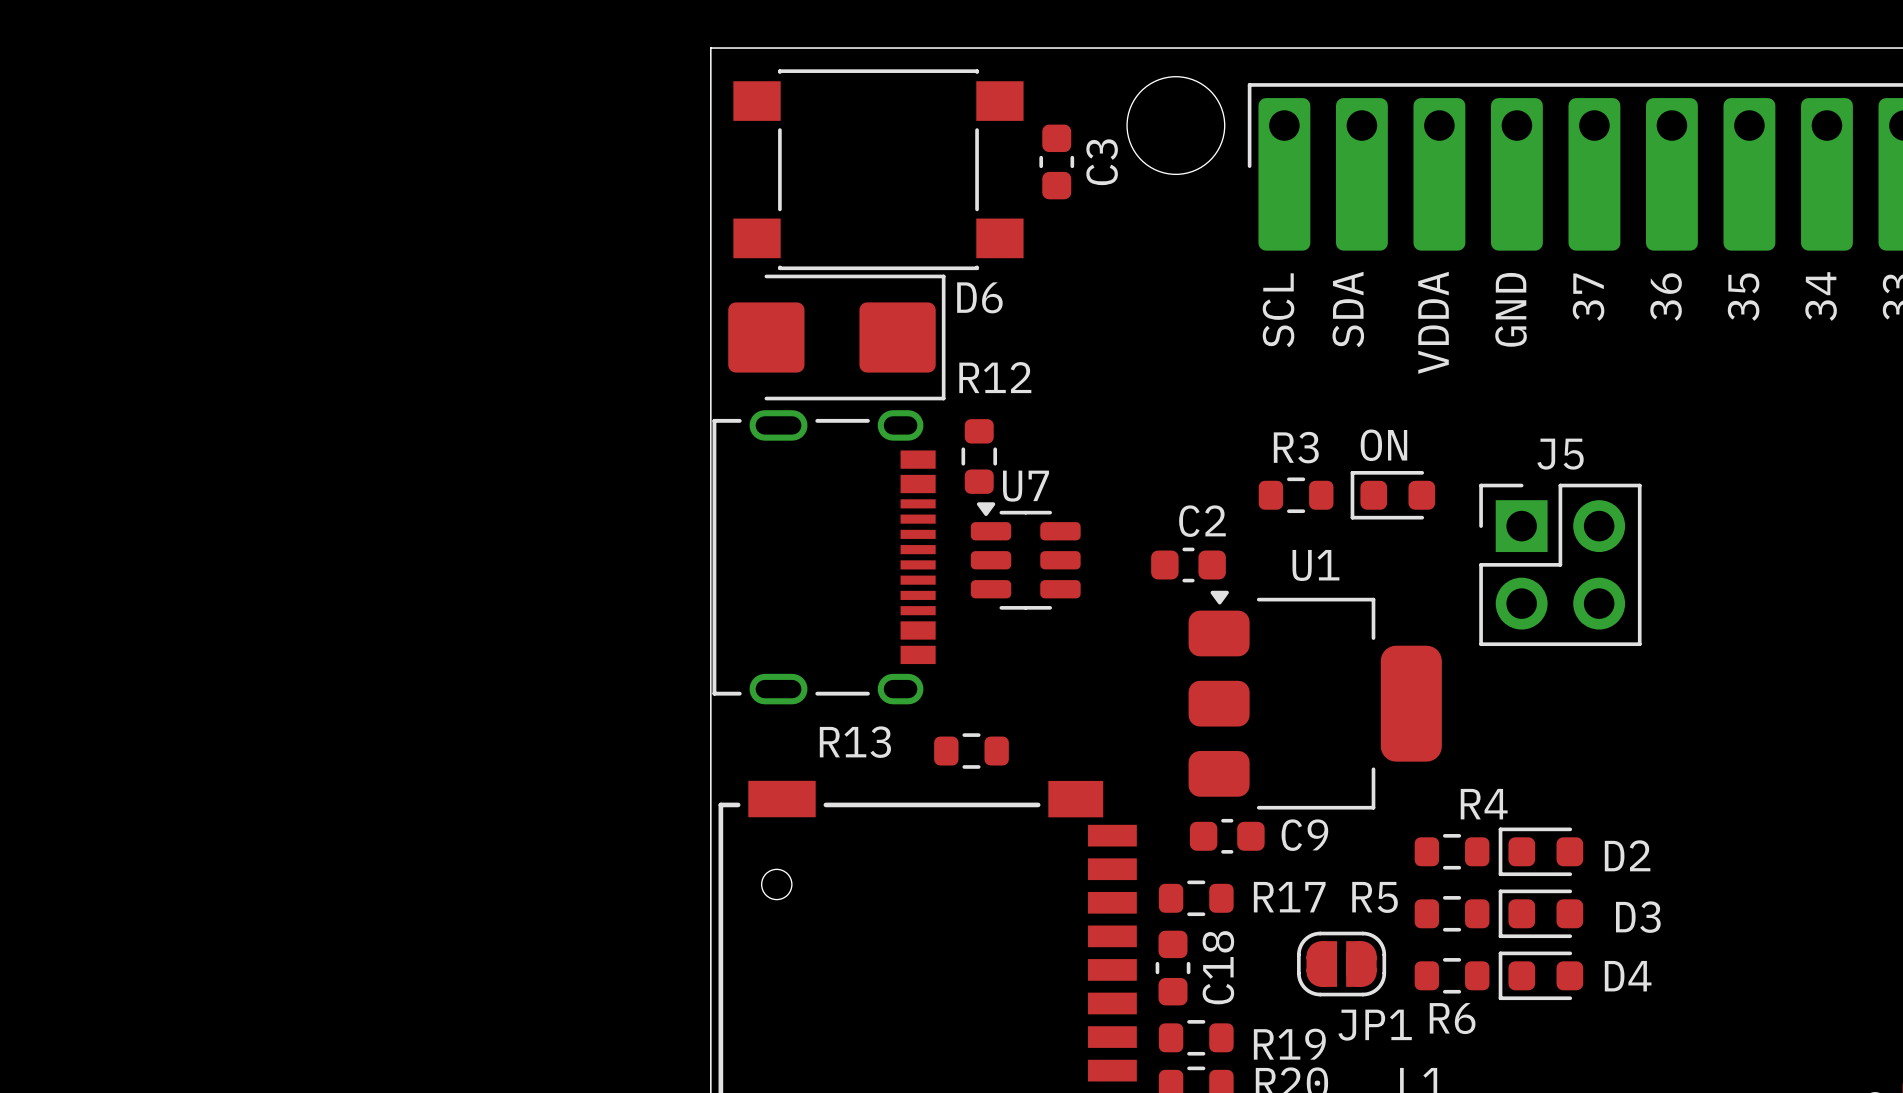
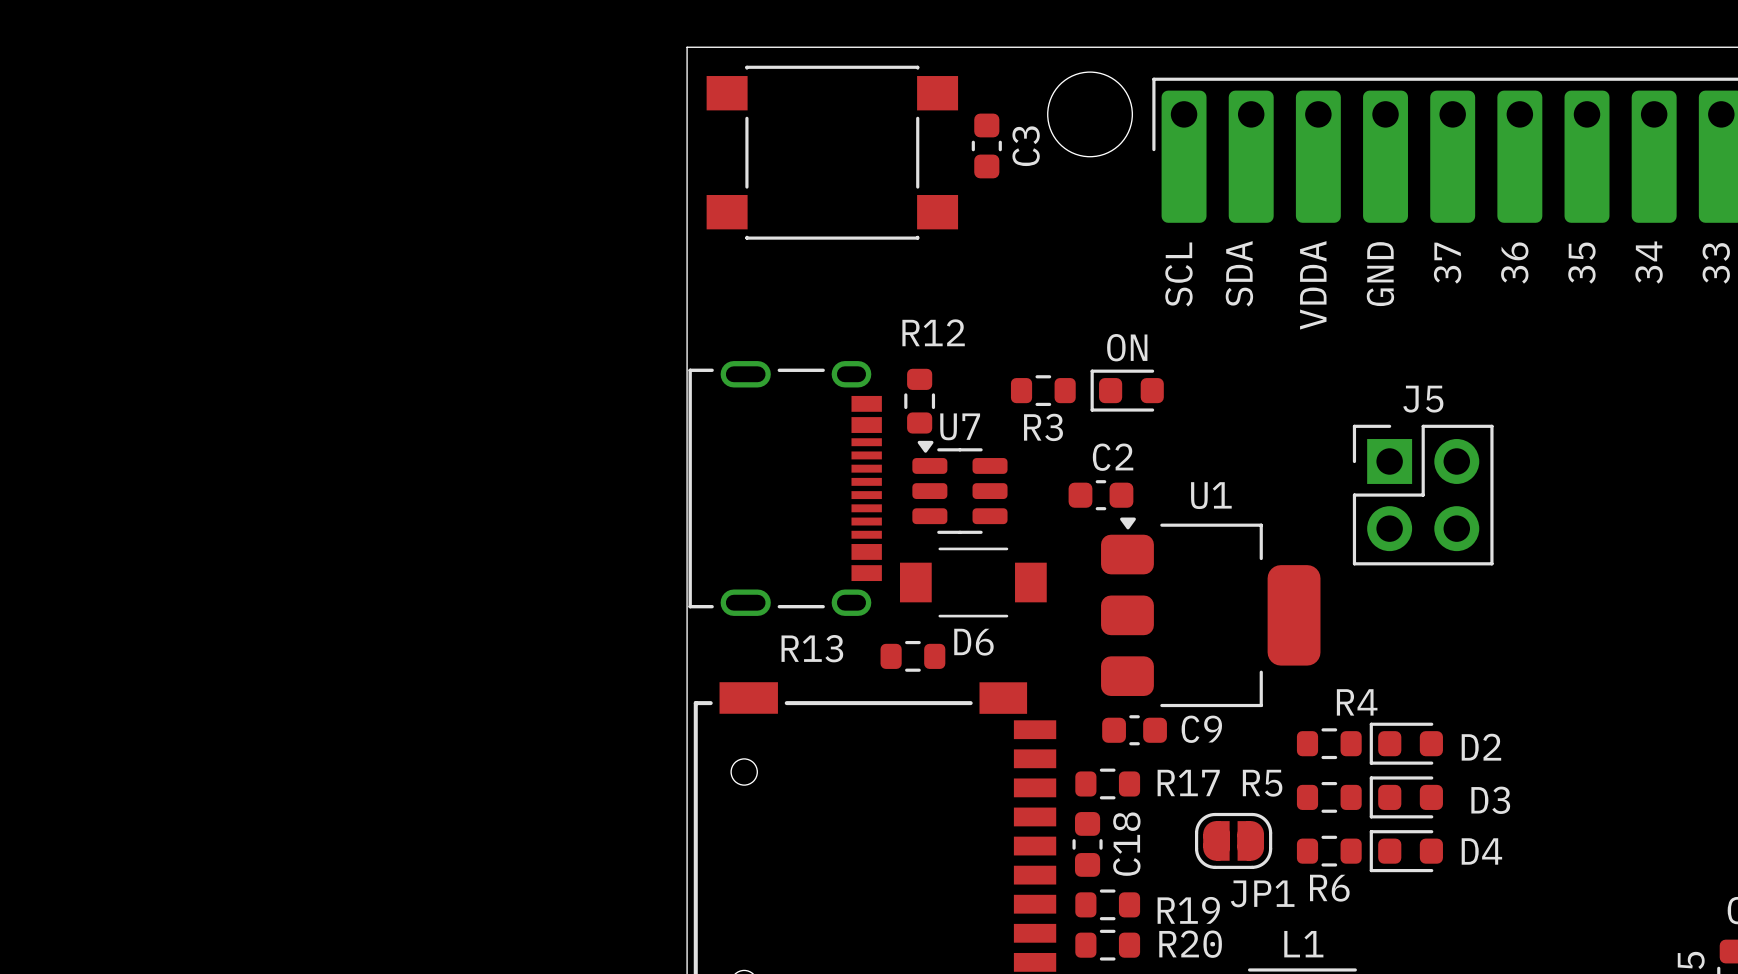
D6 footprint: [728, 274, 946, 401] -> [900, 547, 1047, 618]
D6 name position: D6 (979, 297) -> D6 (973, 642)
text position: ON (1383, 445) -> ON (1127, 347)
R3 name position: R3 (1296, 447) -> R3 (1043, 427)
R3 position: (1296, 495) -> (1043, 390)
part position: (1392, 495) -> (1127, 390)

